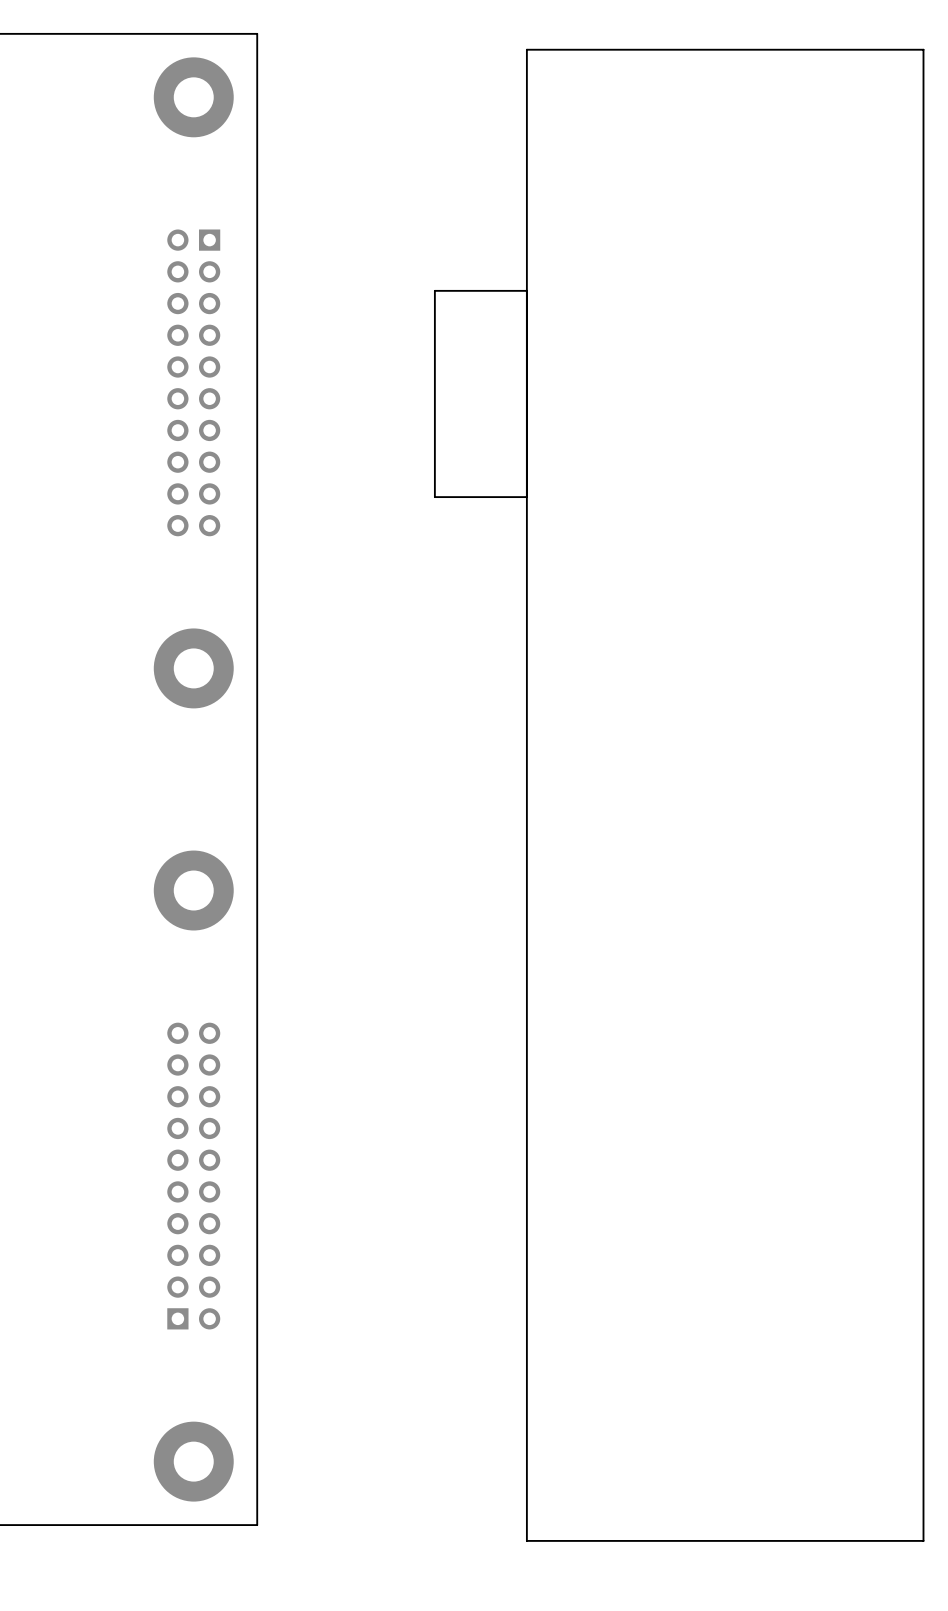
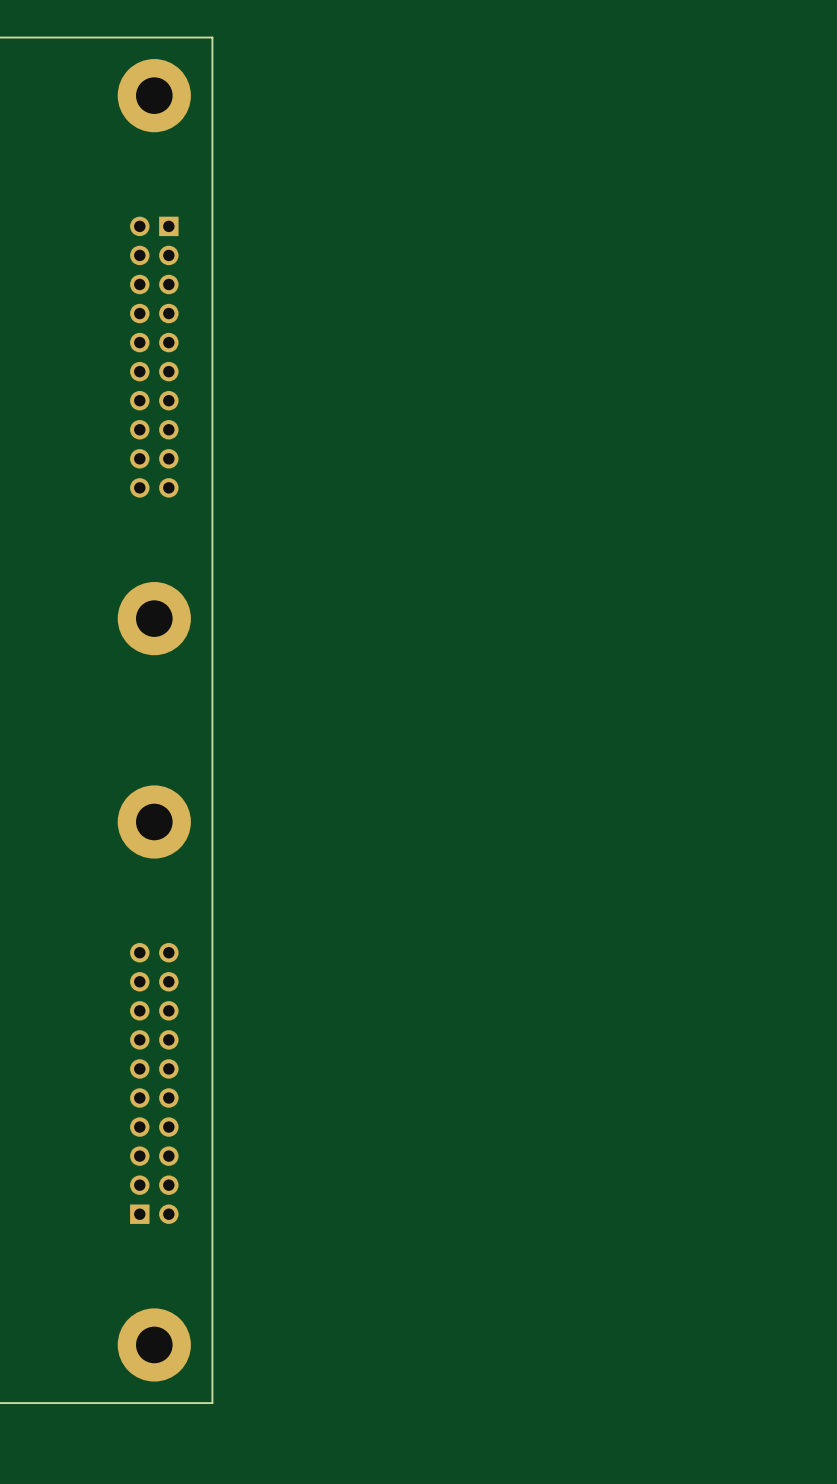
board edge: (923, 49) (526, 49) (526, 1540) (923, 1540) (923, 49) -> none
board edge: (526, 290) (434, 290) (434, 497) (526, 497) -> none

